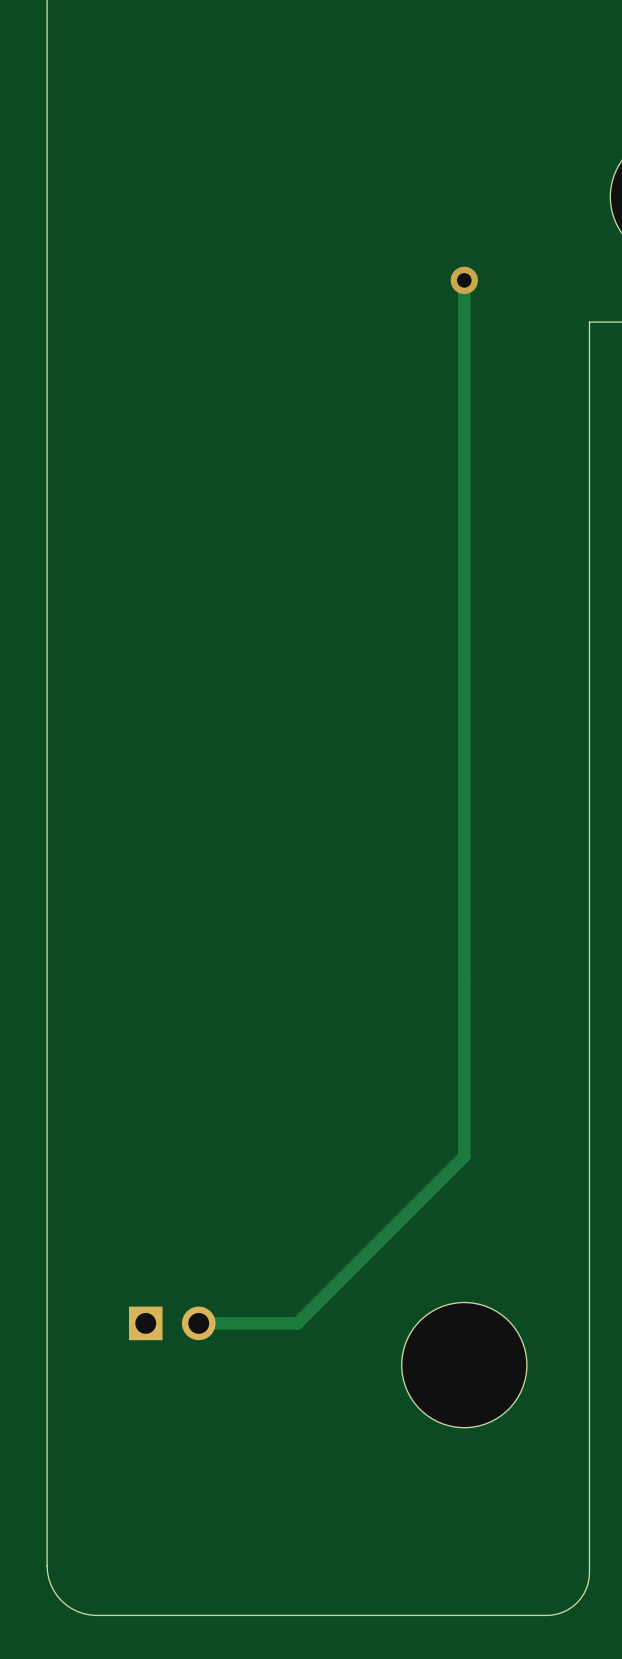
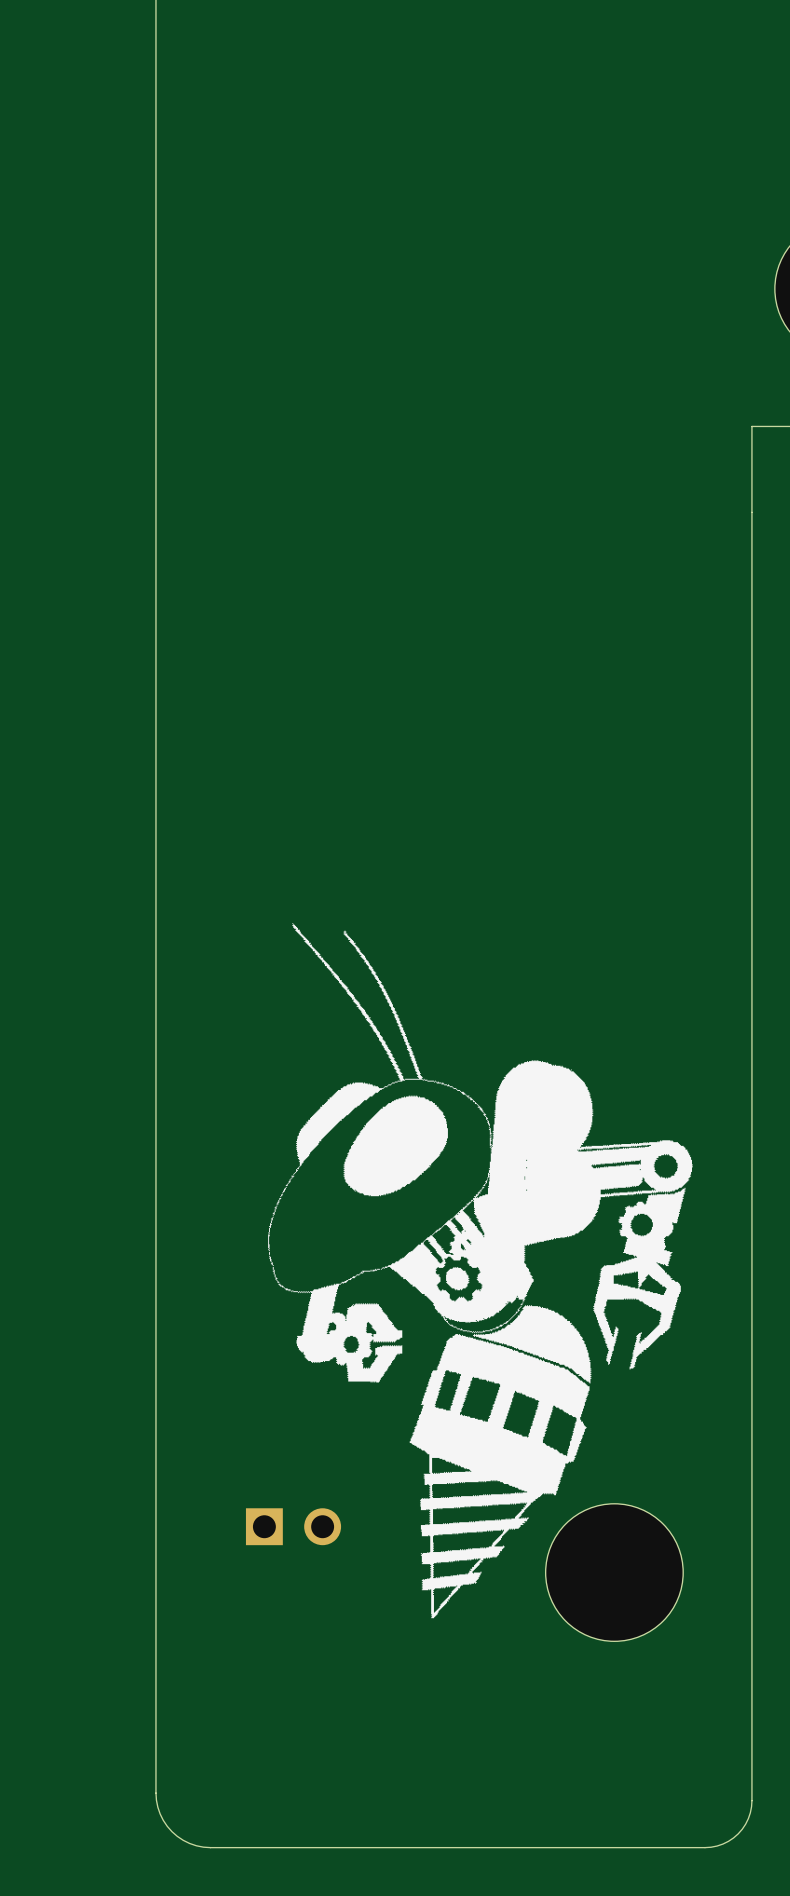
track: (464, 280) (464, 1156) (297, 1323) (198, 1323) -> none
via: (464, 280) -> none
drawing: none -> [268, 923, 693, 1619]

